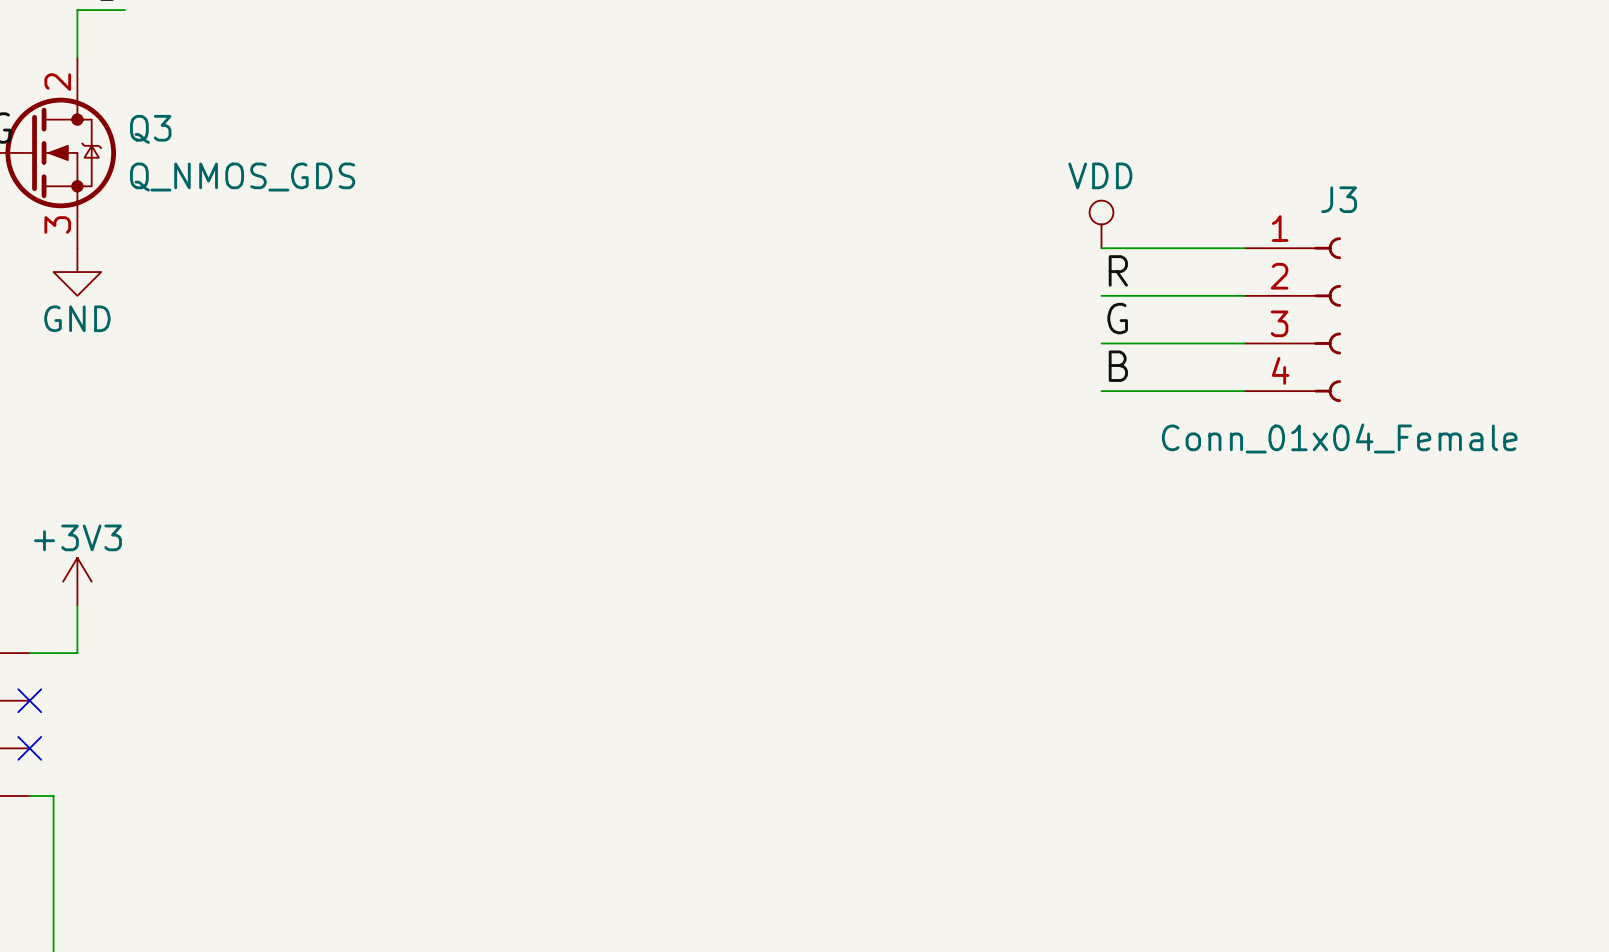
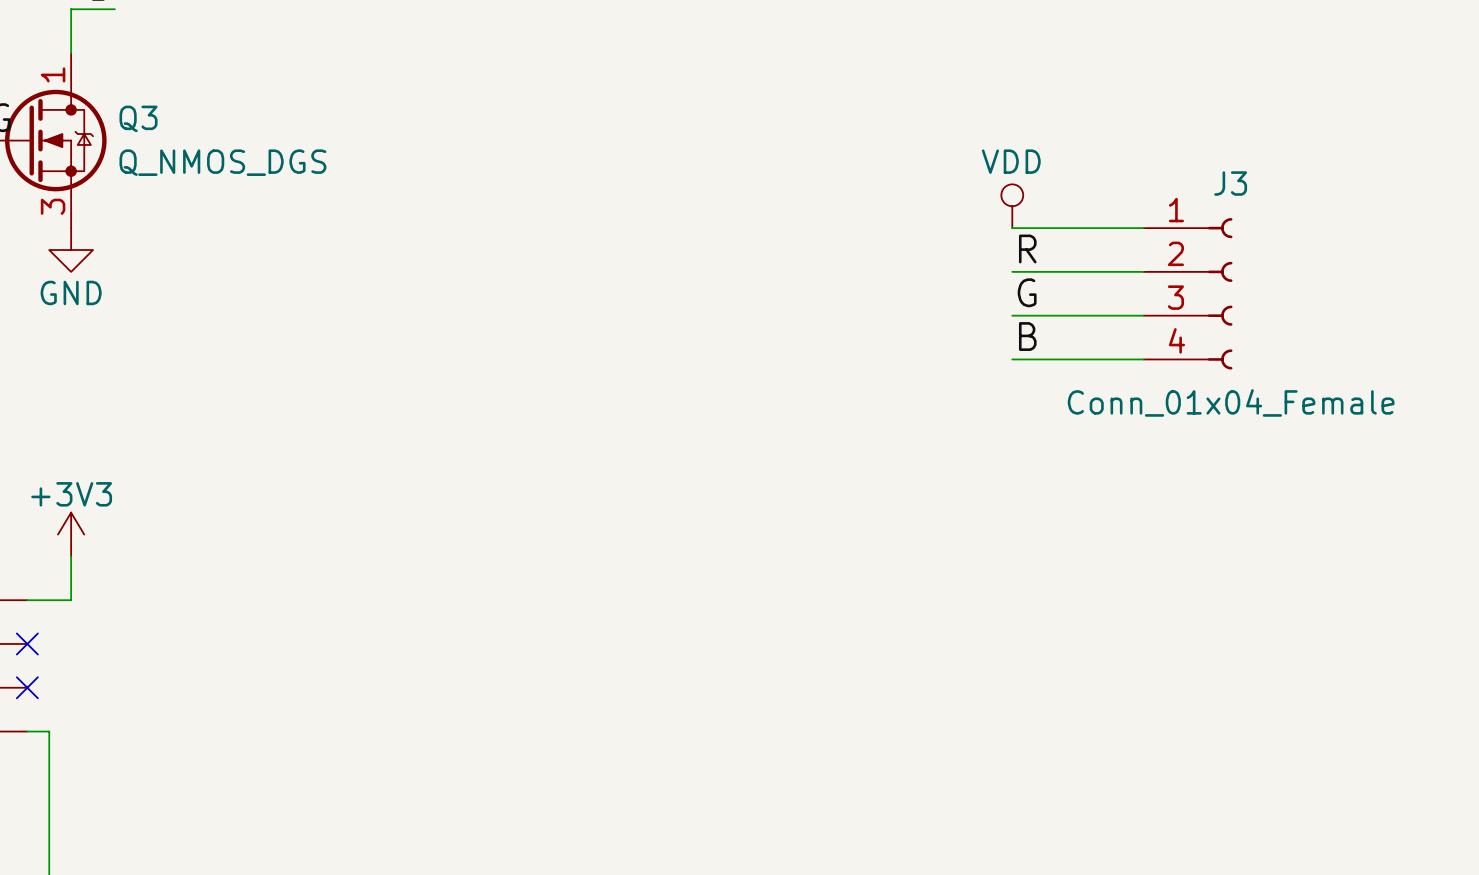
Q3 pin number: 2 (57, 82) -> 1 (53, 74)
Q3 value: Q_NMOS_GDS (242, 177) -> Q_NMOS_DGS (222, 162)

